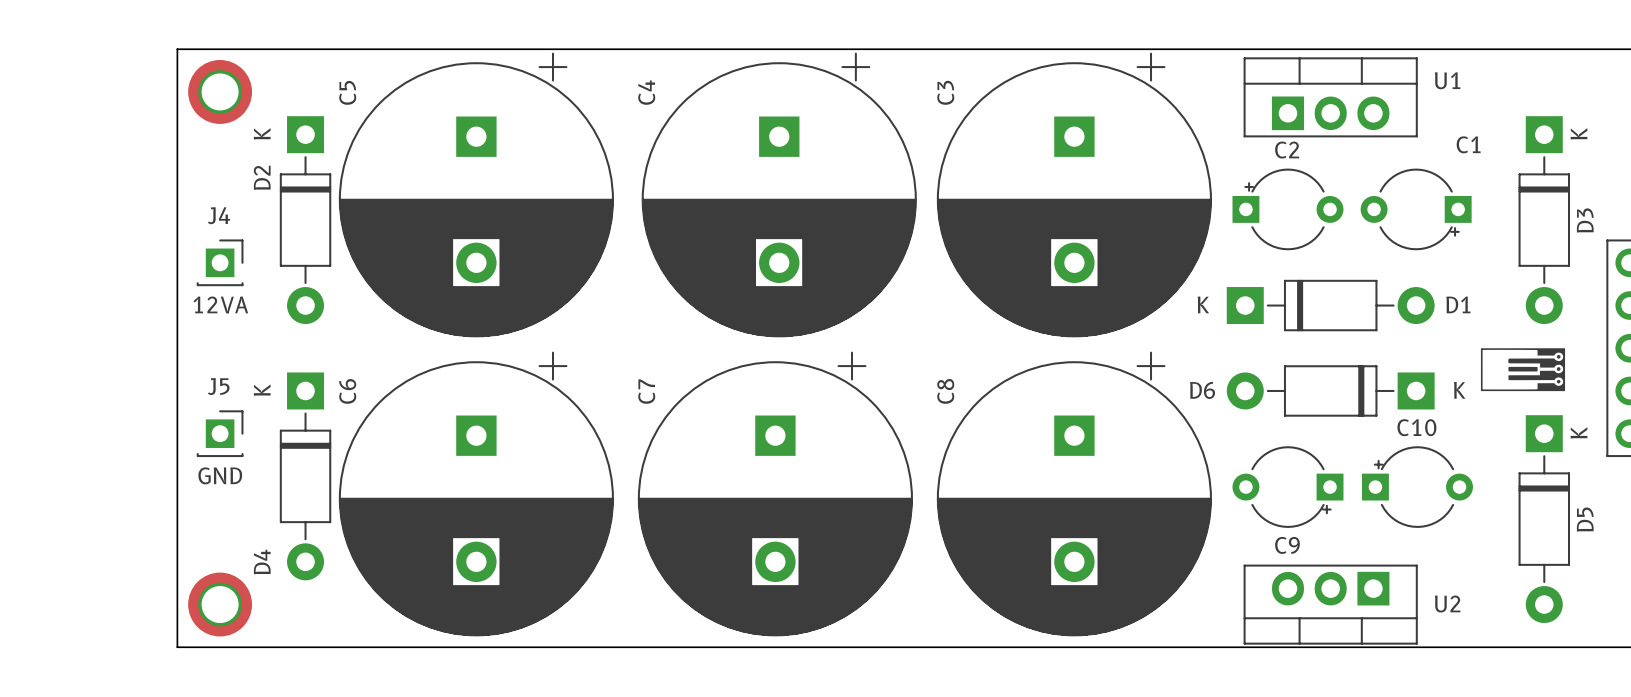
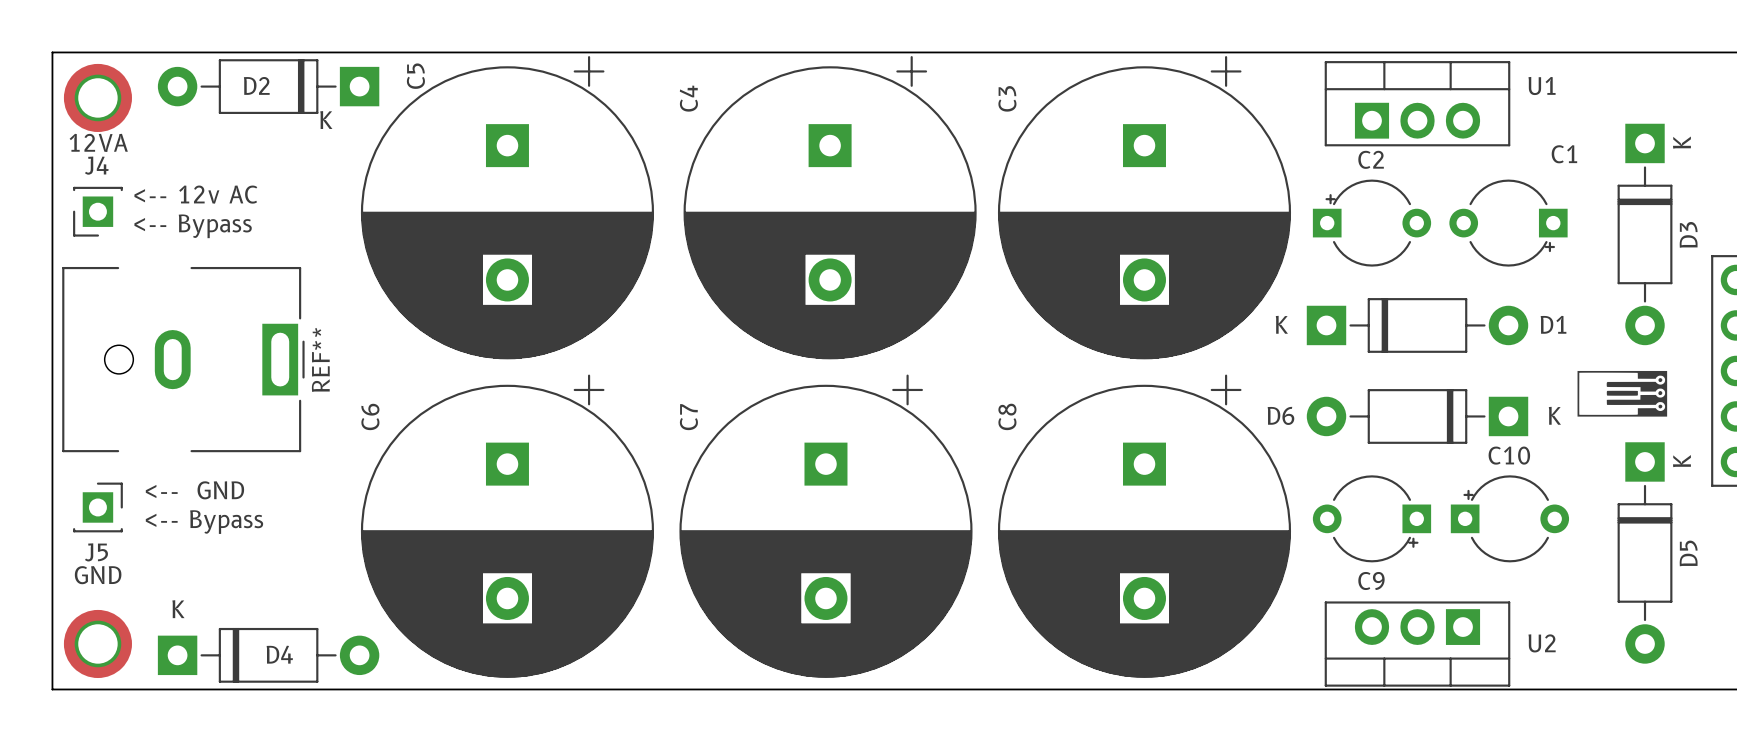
board edge: (177, 49) (177, 647) -> (188, 52) (52, 52) (52, 689) (188, 689)
part position: (220, 91) -> (97, 97)
C5 name position: C5 (347, 92) -> C5 (415, 76)
D2 footprint: [279, 116, 332, 325] -> [157, 59, 380, 114]
D2 name position: D2 (262, 177) -> D2 (256, 85)
text: none -> <-- 12v AC (195, 194)
text: none -> <-- Bypass (193, 226)
J4 rotation: 0° (220, 262) -> 180° (97, 211)
J4 position: (220, 262) -> (97, 211)
REF**: none -> (183, 359)
D4 footprint: [279, 372, 332, 581] -> [157, 627, 380, 683]
J5 name position: J5 (218, 386) -> J5 (96, 552)
J5 position: (220, 433) -> (97, 507)
text: none -> <-- GND (194, 490)
J5 value position: GND (220, 475) -> GND (98, 575)
text: none -> <-- Bypass (204, 522)
D4 name position: D4 (262, 561) -> D4 (279, 654)
part position: (220, 604) -> (97, 643)

